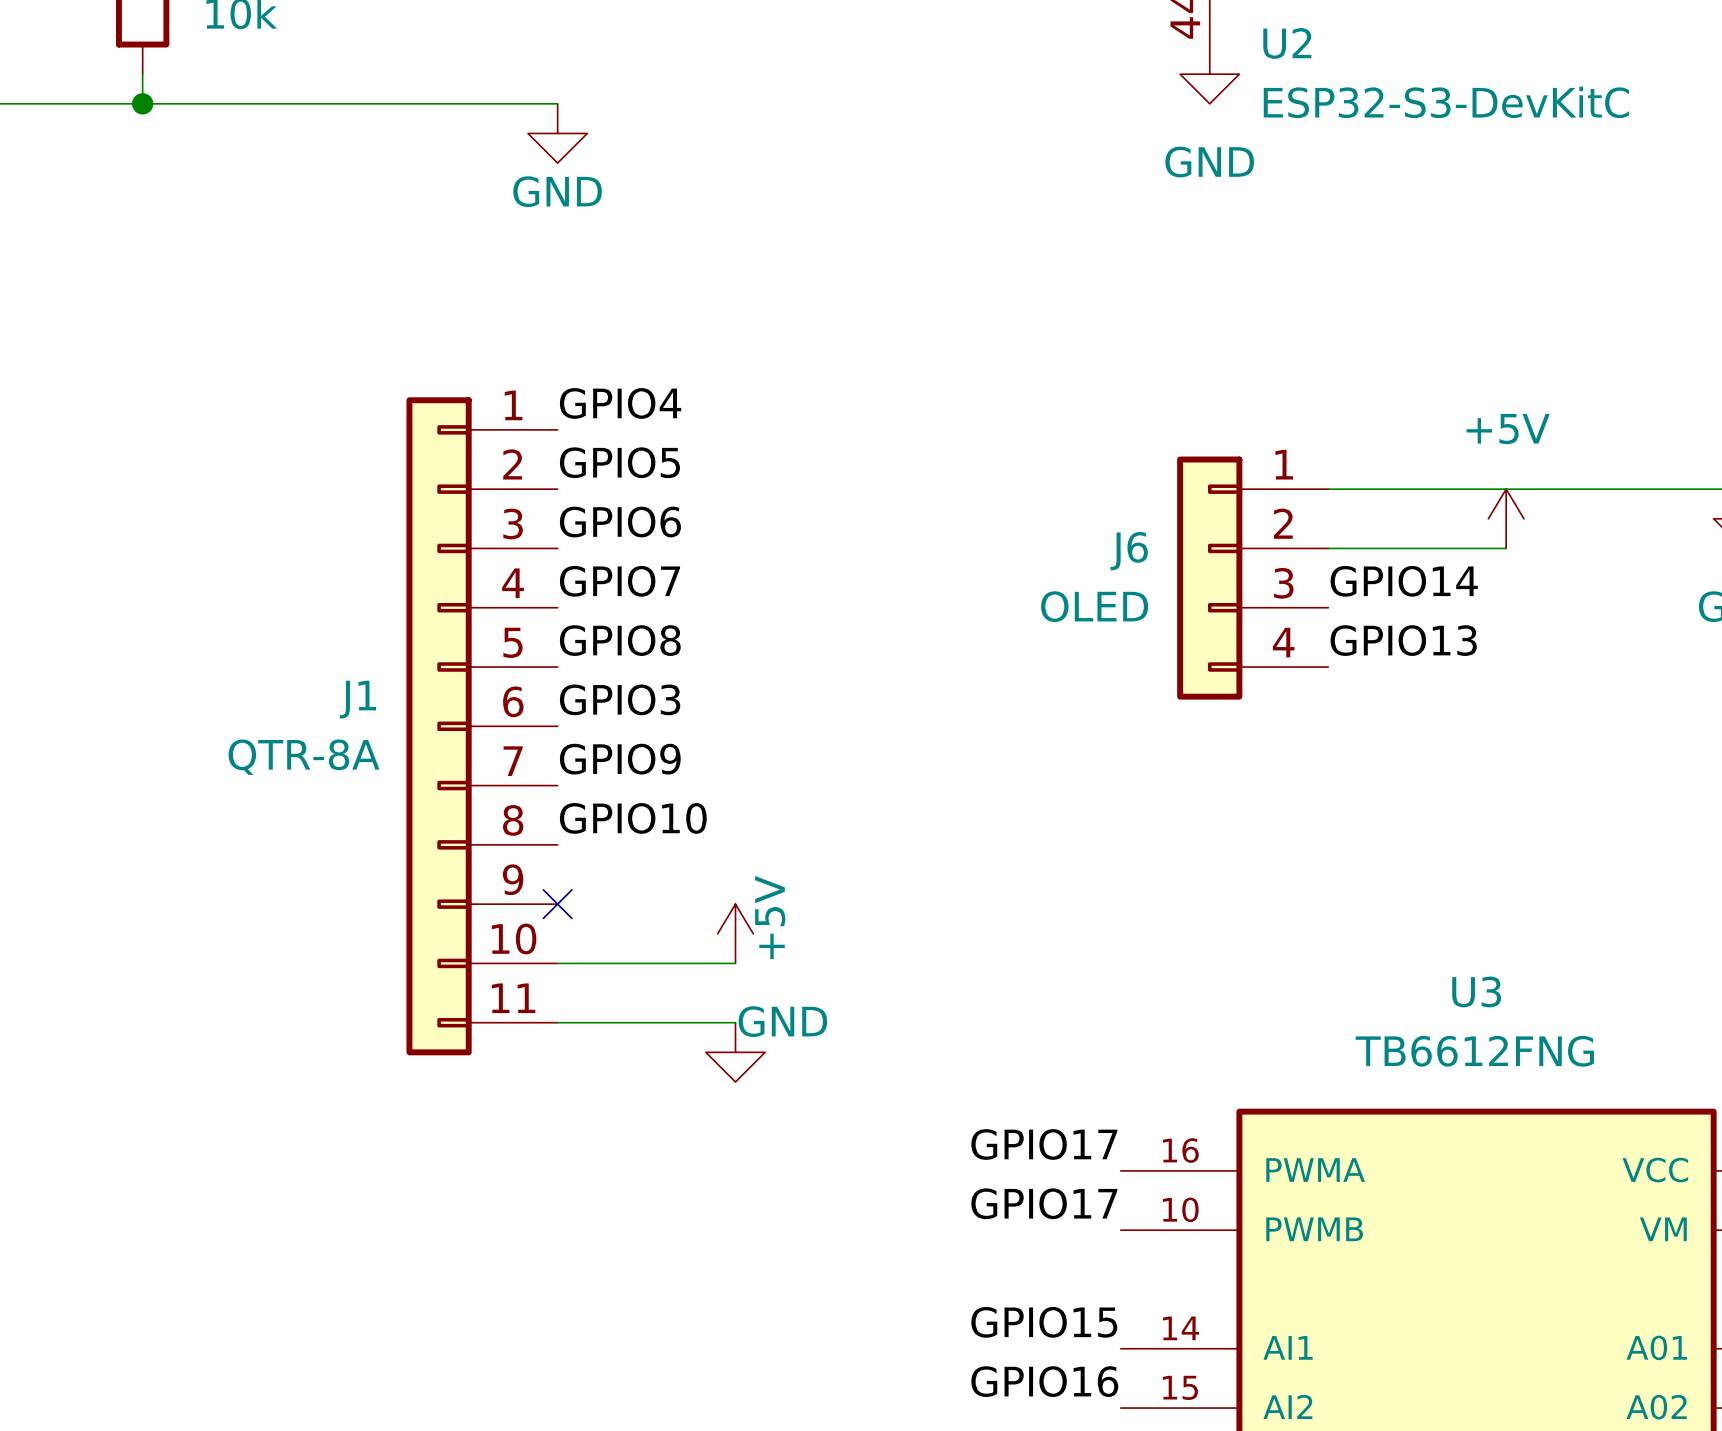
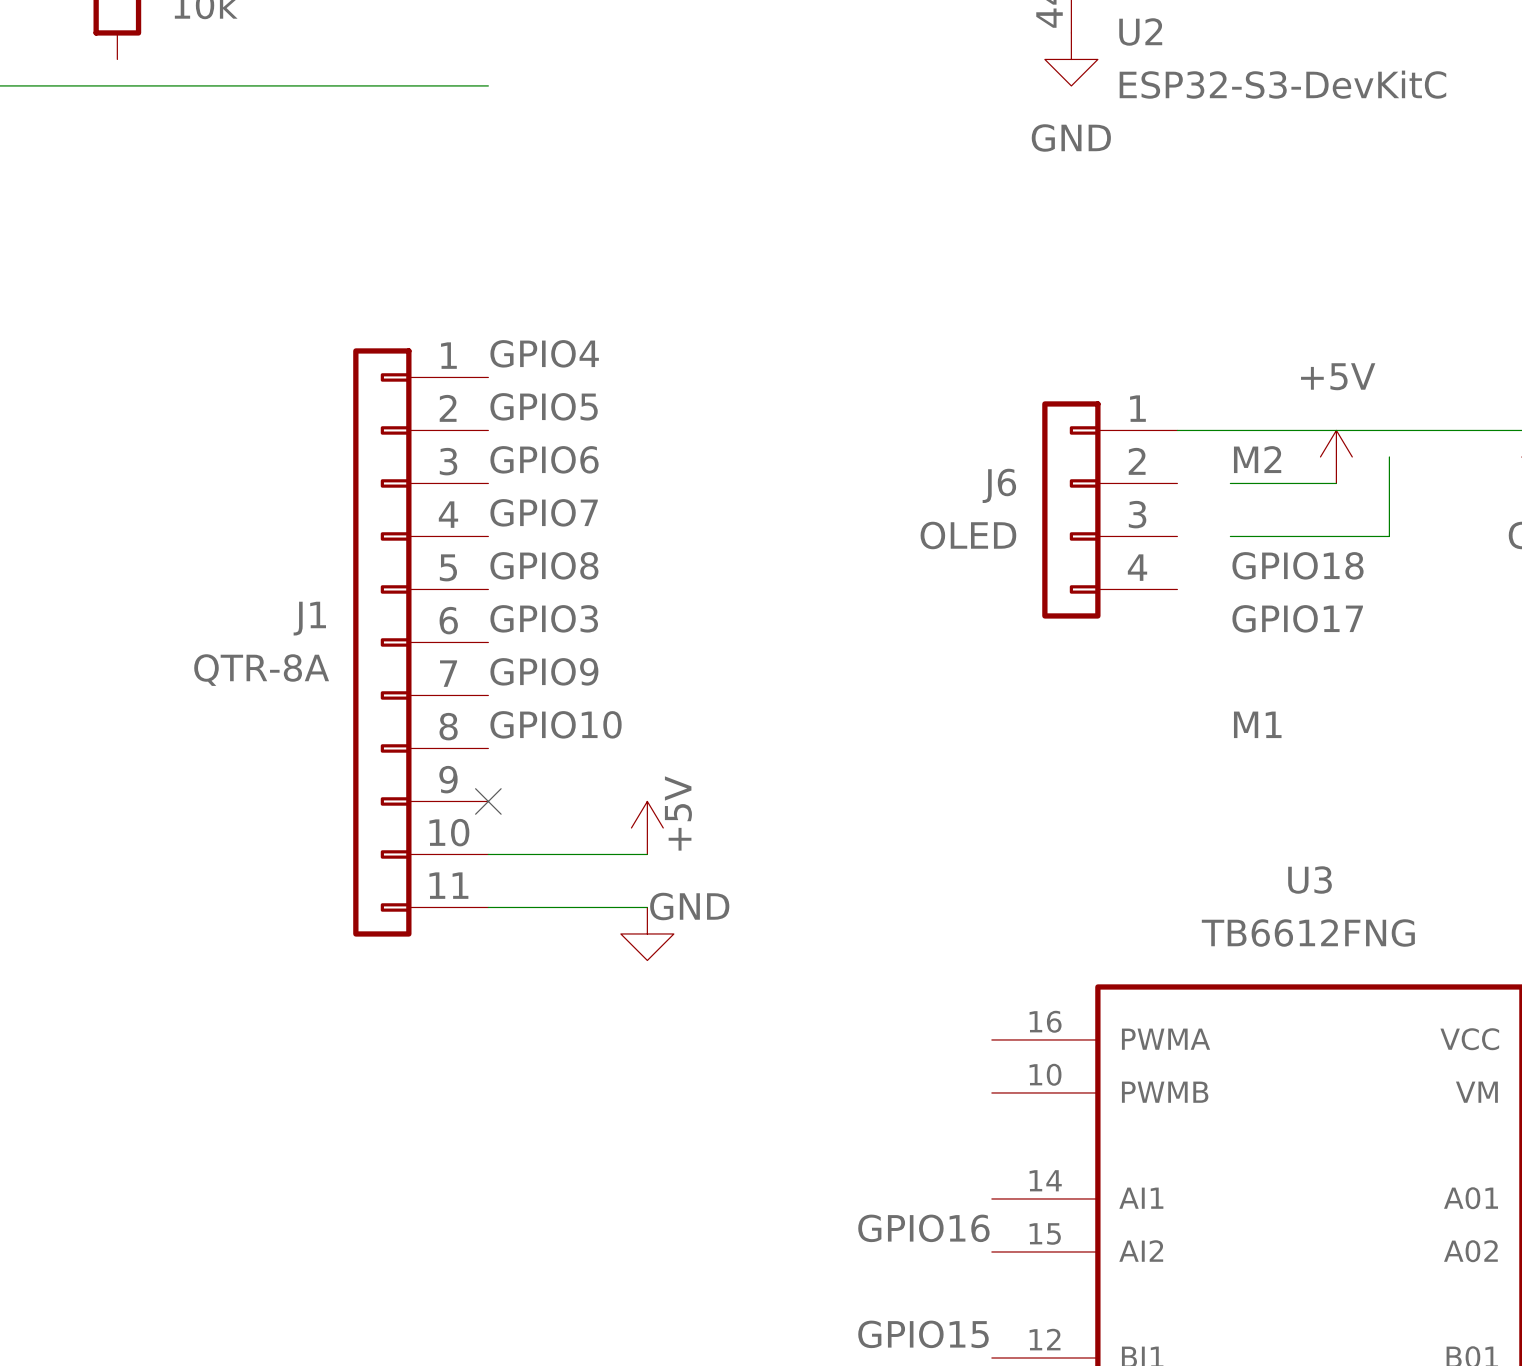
wire: (142, 74) (142, 103) -> none
junction: (142, 103) -> none
power symbol: GND (557, 133) -> none
wire: none -> (1389, 456) (1389, 536) (1230, 536)
label: none -> M2 (1257, 459)
wire: (1328, 548) (1387, 548) -> none
label: GPIO14 (1404, 581) -> none
label: GPIO13 (1403, 640) -> none
label: none -> GPIO18 (1298, 565)
label: none -> GPIO17 (1297, 618)
label: none -> M1 (1257, 724)
label: GPIO17 (1044, 1144) -> none
label: GPIO17 (1044, 1203) -> none
label: GPIO15 (1044, 1322) -> none

